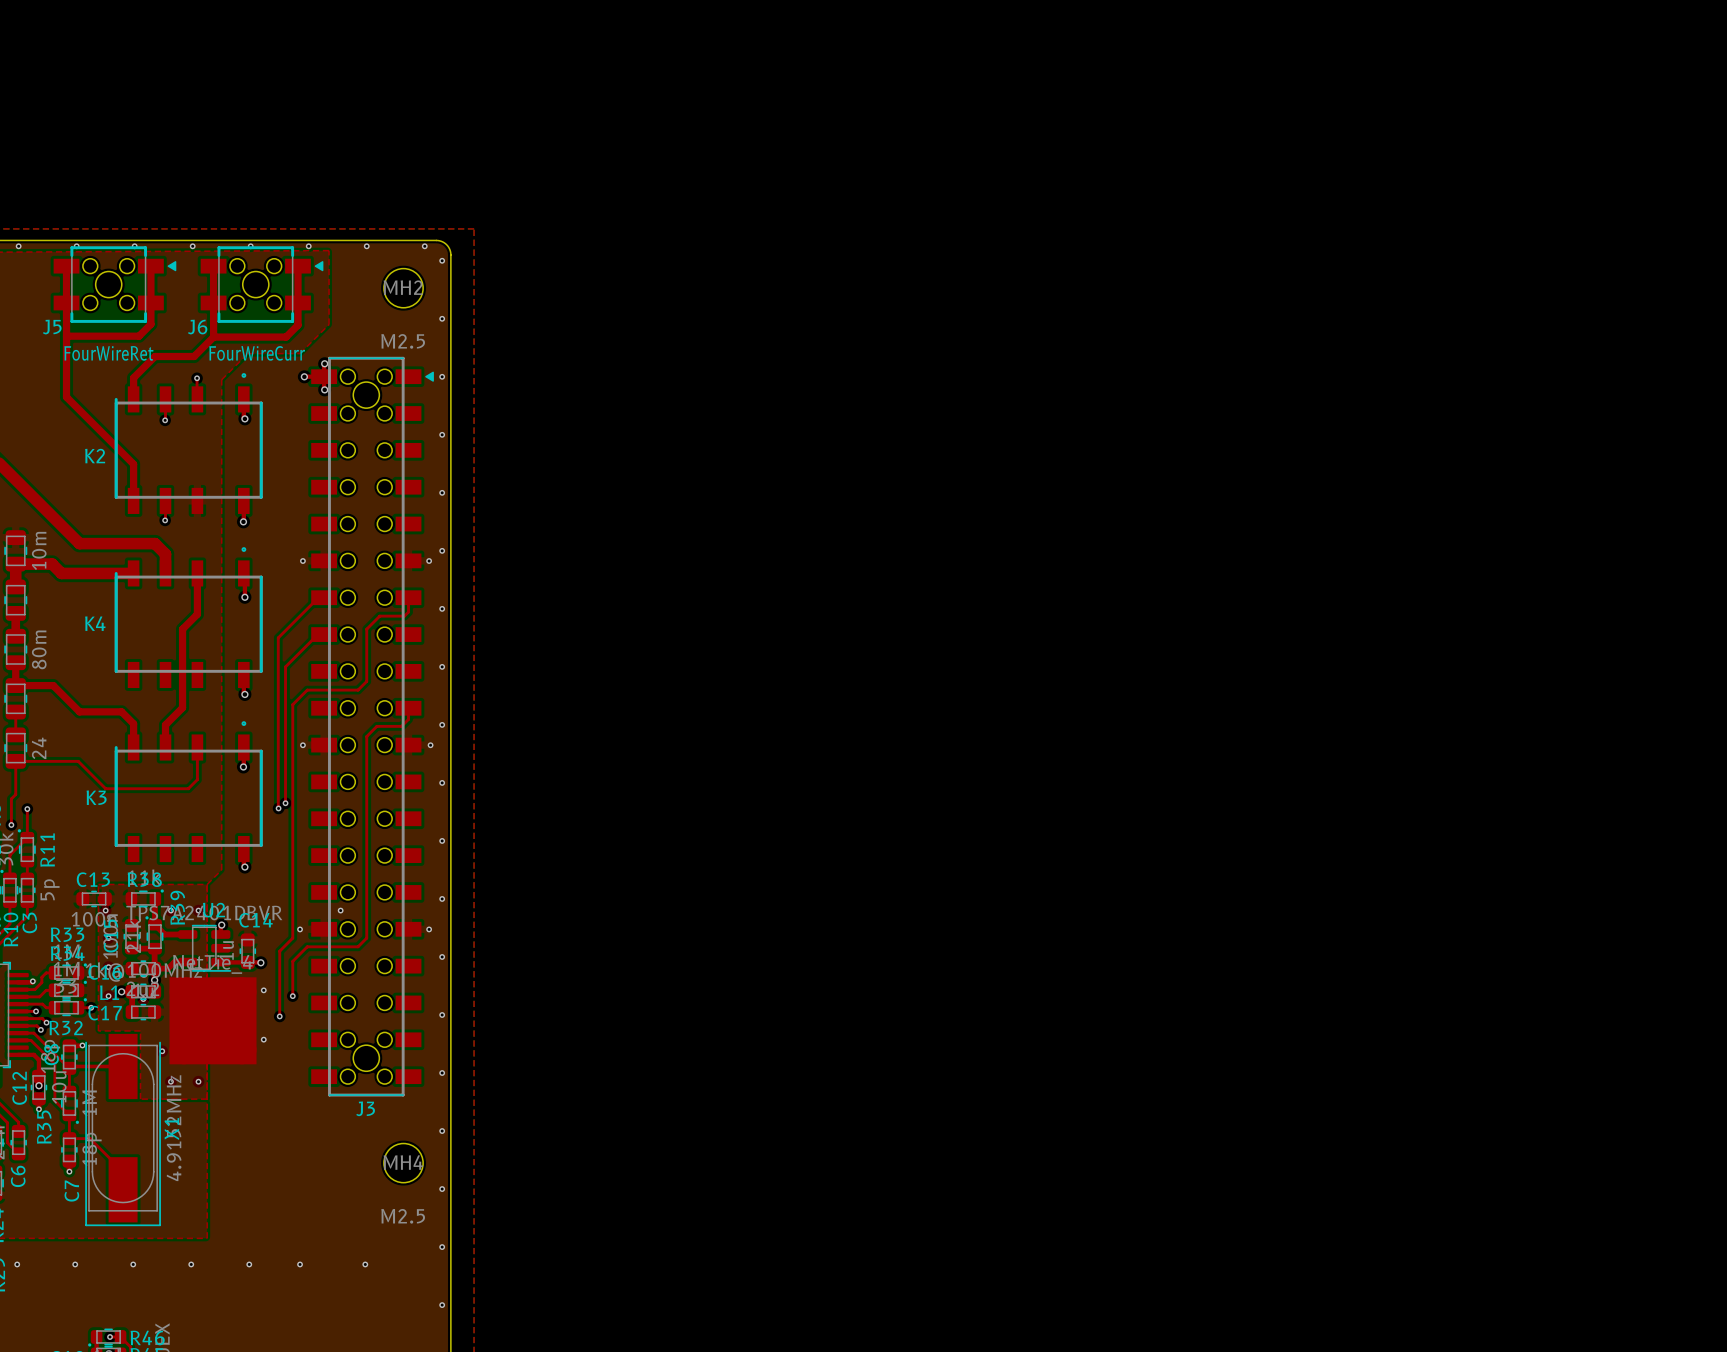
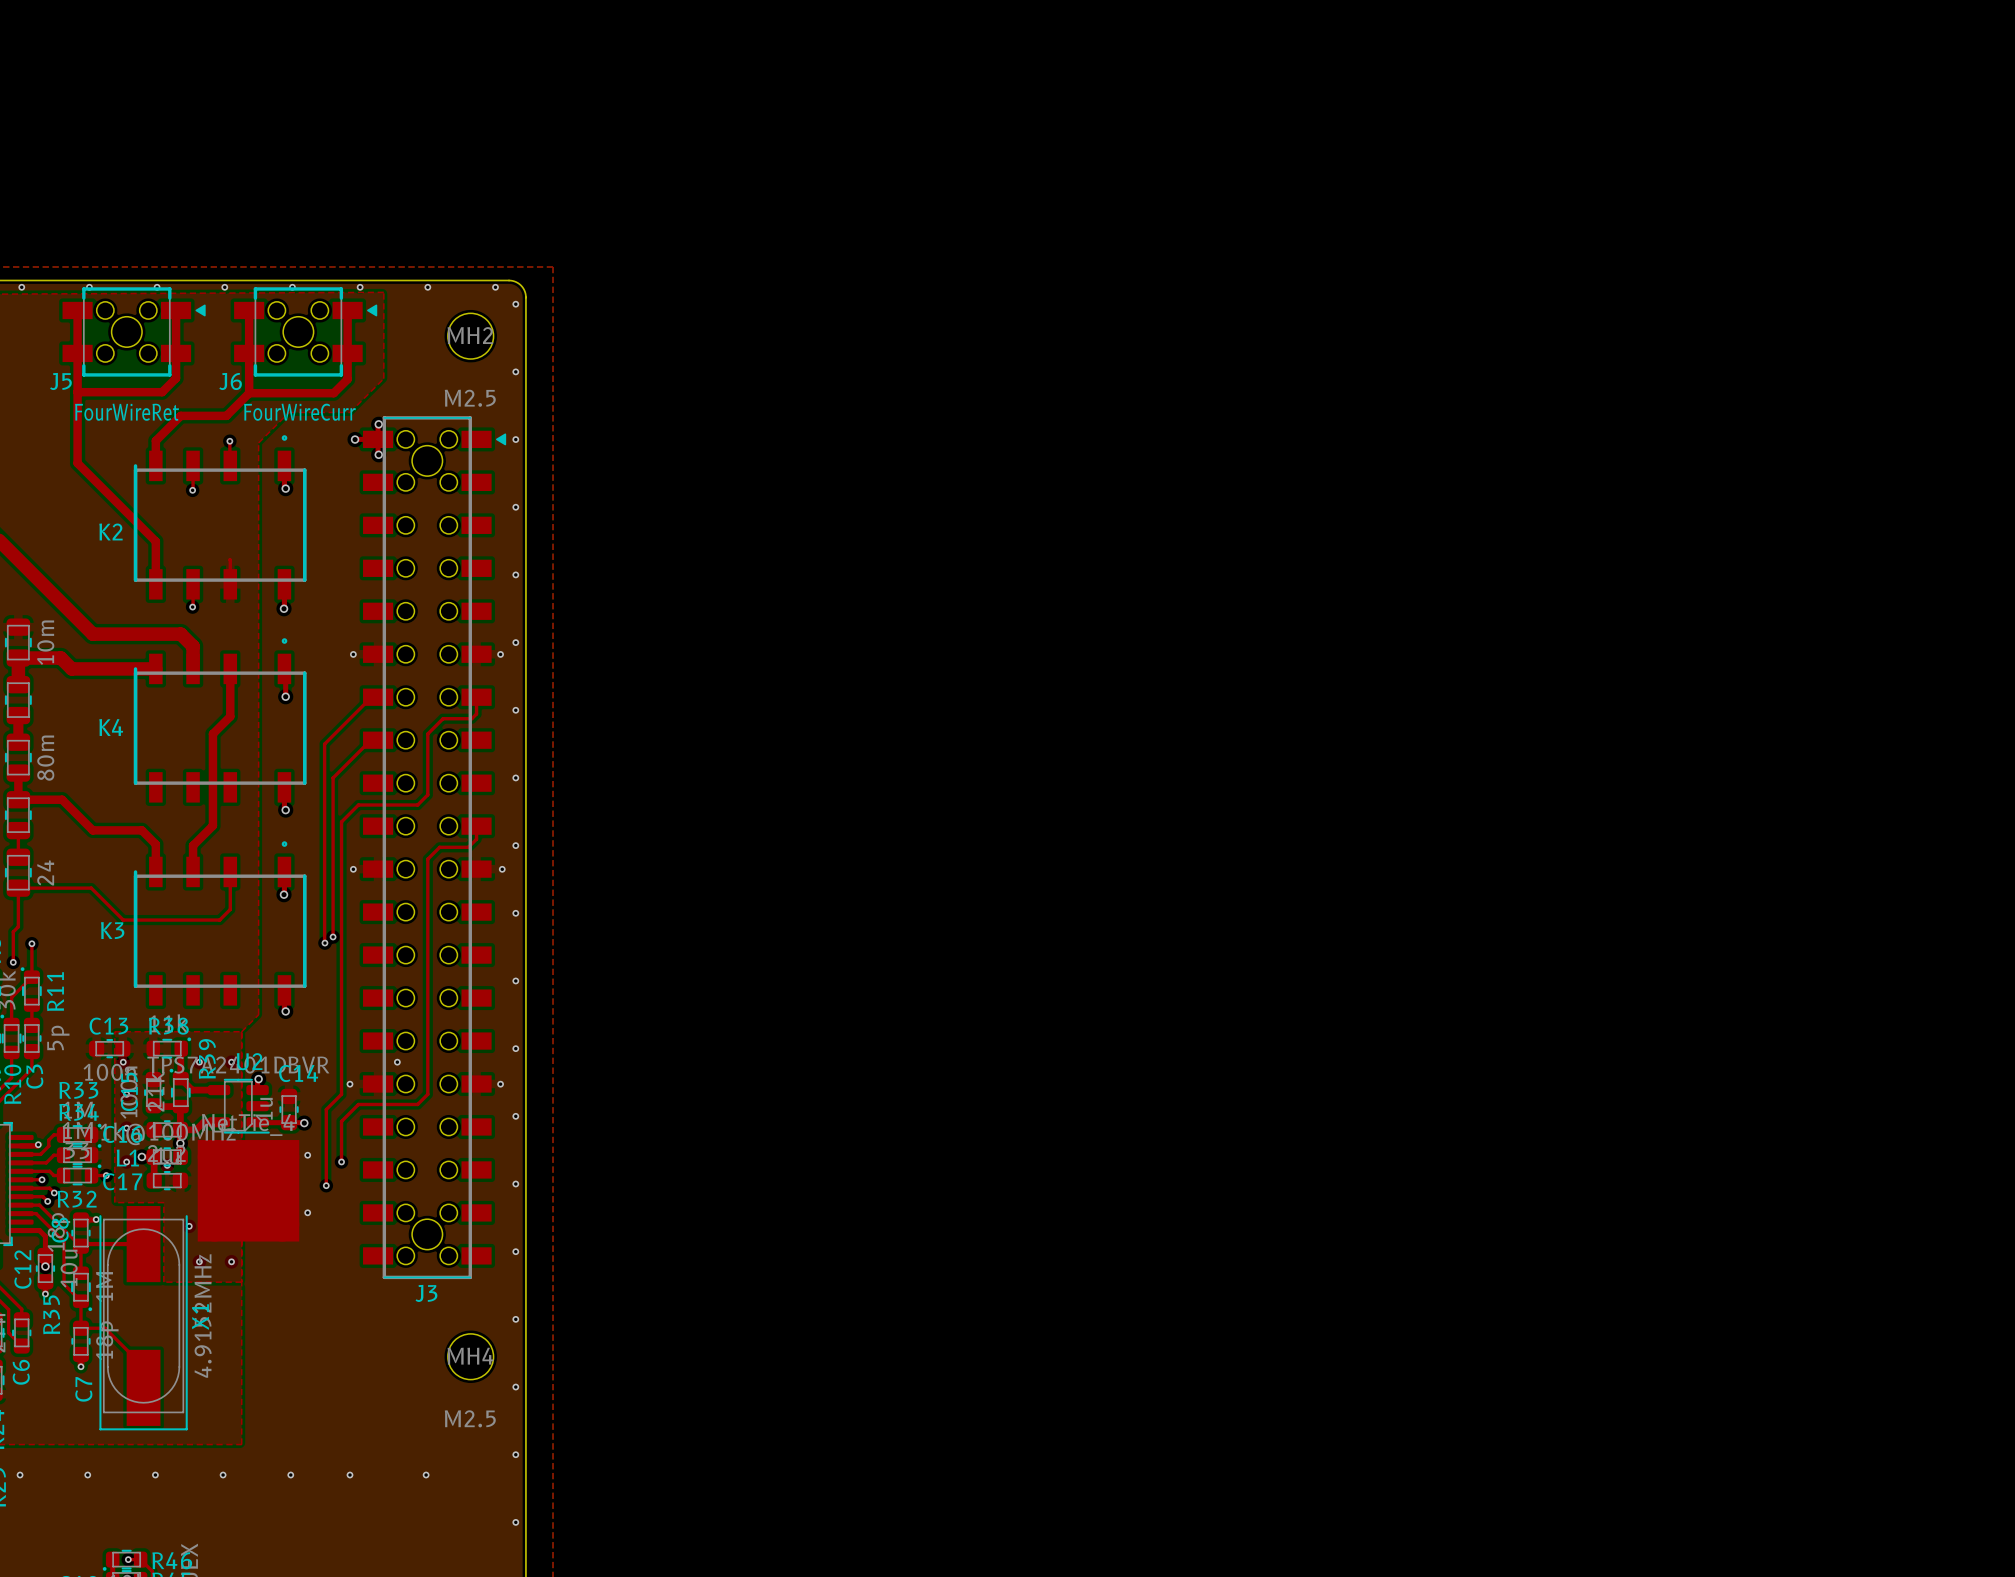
top track: none -> (229, 559) (230, 584)

